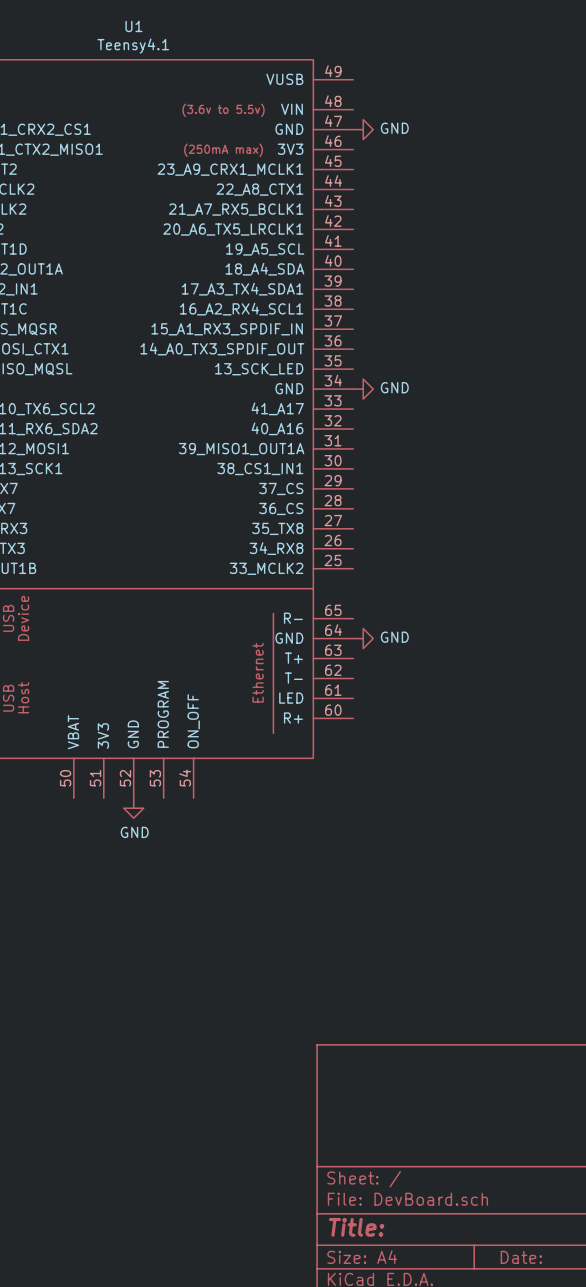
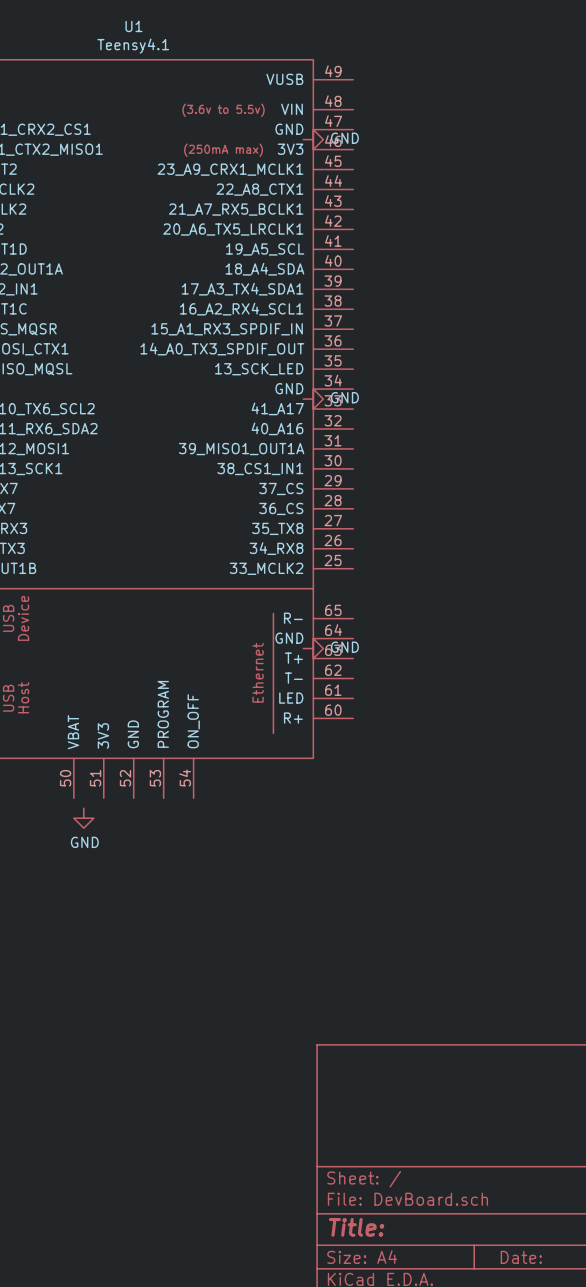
power symbol position: GND (363, 129) -> GND (313, 139)
power symbol position: GND (363, 389) -> GND (313, 399)
power symbol position: GND (363, 638) -> GND (313, 648)
power symbol position: GND (133, 808) -> GND (83, 818)

